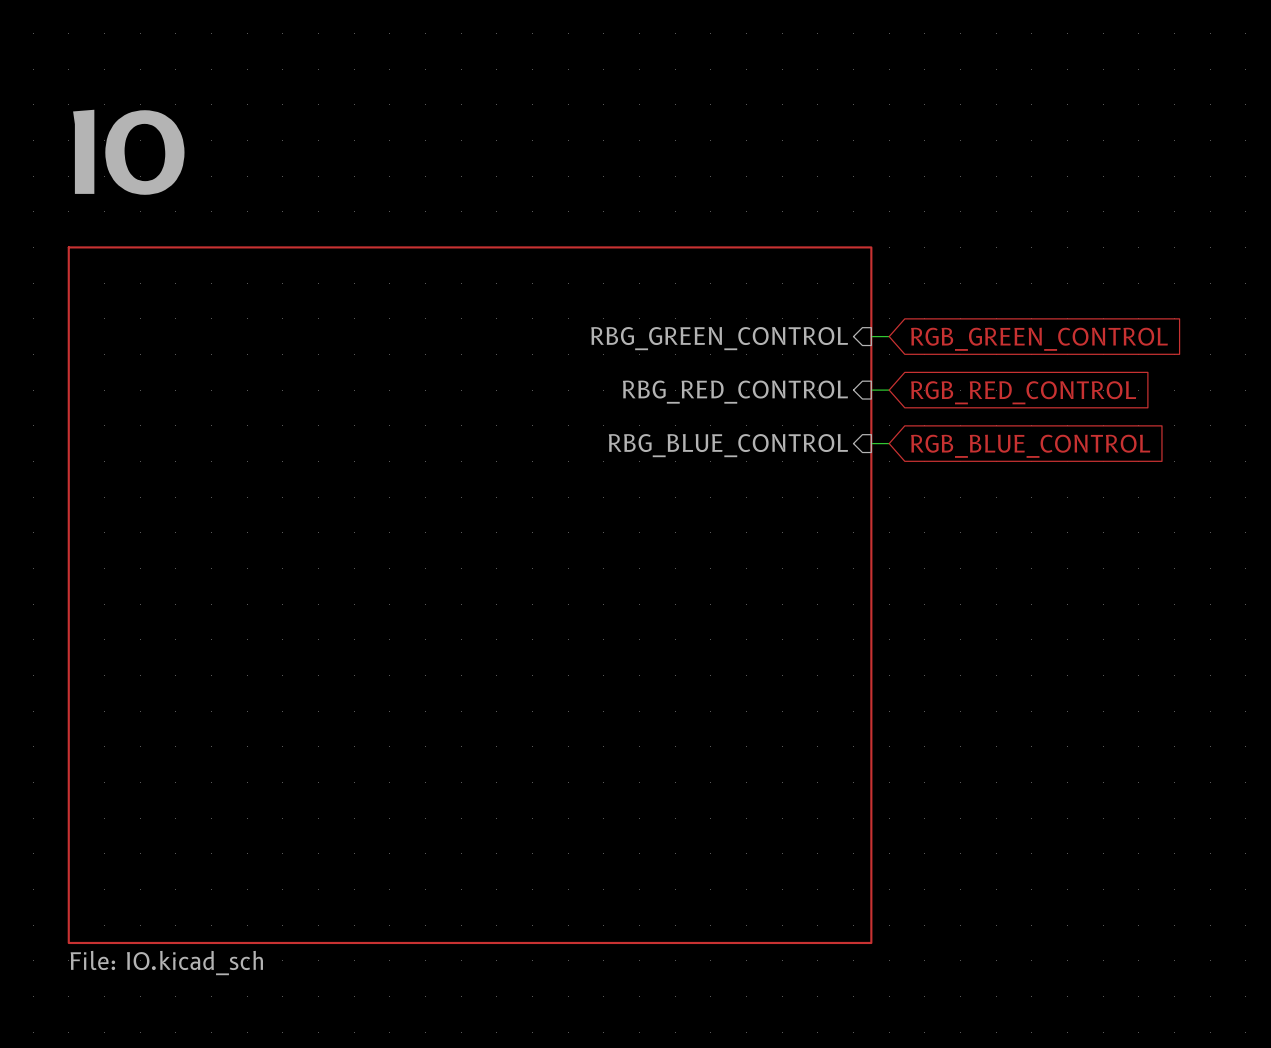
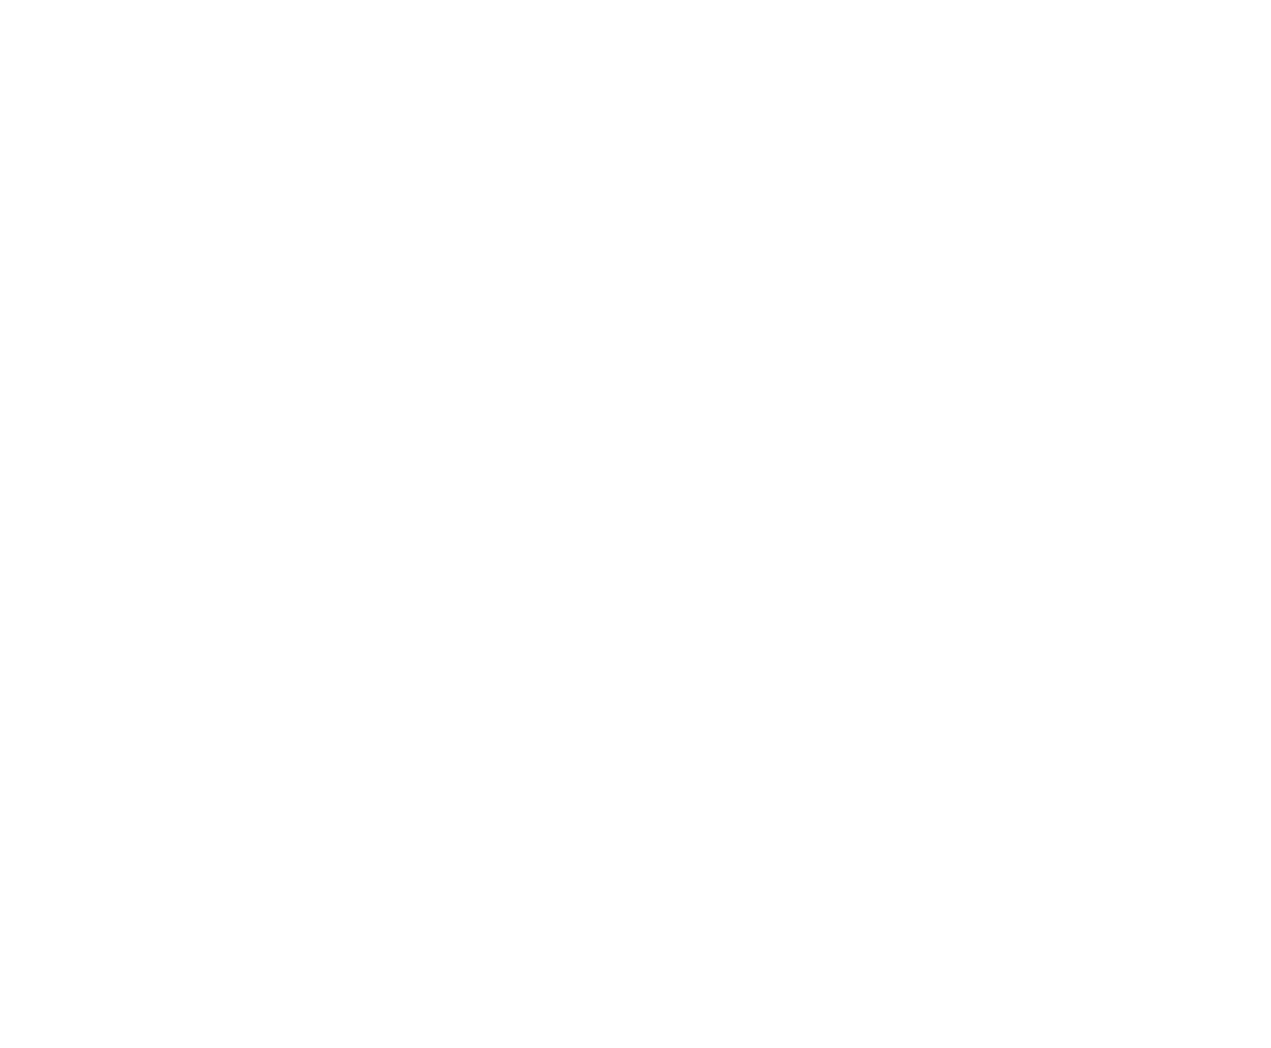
wire: (871, 336) (889, 336) -> none
sheet pin: RBG_GREEN_CONTROL (719, 338) -> none
global label: RGB_GREEN_CONTROL (1039, 339) -> none
wire: (871, 390) (889, 390) -> none
sheet pin: RBG_RED_CONTROL (735, 392) -> none
global label: RGB_RED_CONTROL (1023, 392) -> none
wire: (871, 443) (889, 443) -> none
sheet pin: RBG_BLUE_CONTROL (728, 445) -> none
global label: RGB_BLUE_CONTROL (1030, 446) -> none
sheet IO: File: IO.kicad_sch (470, 595) -> none

